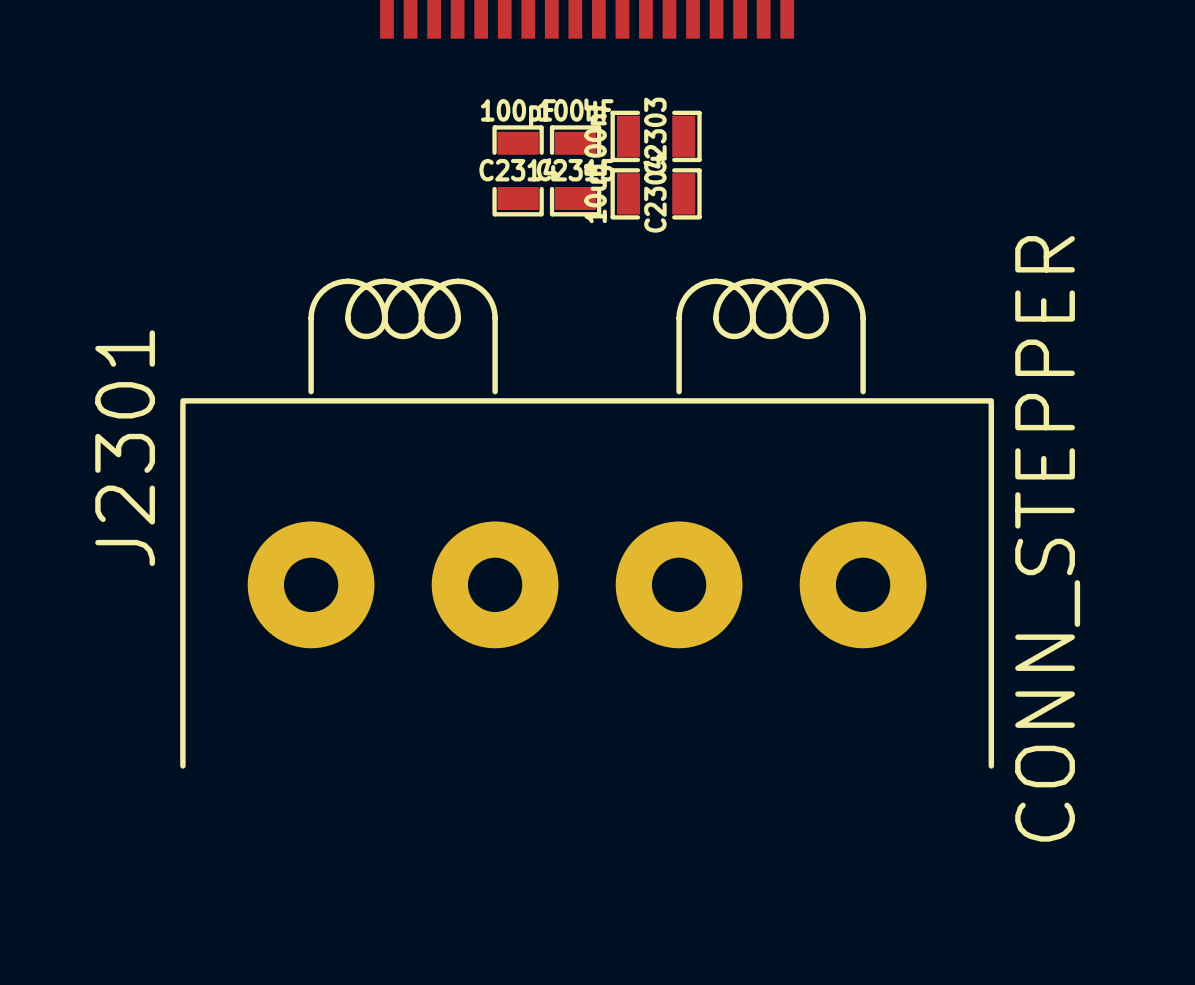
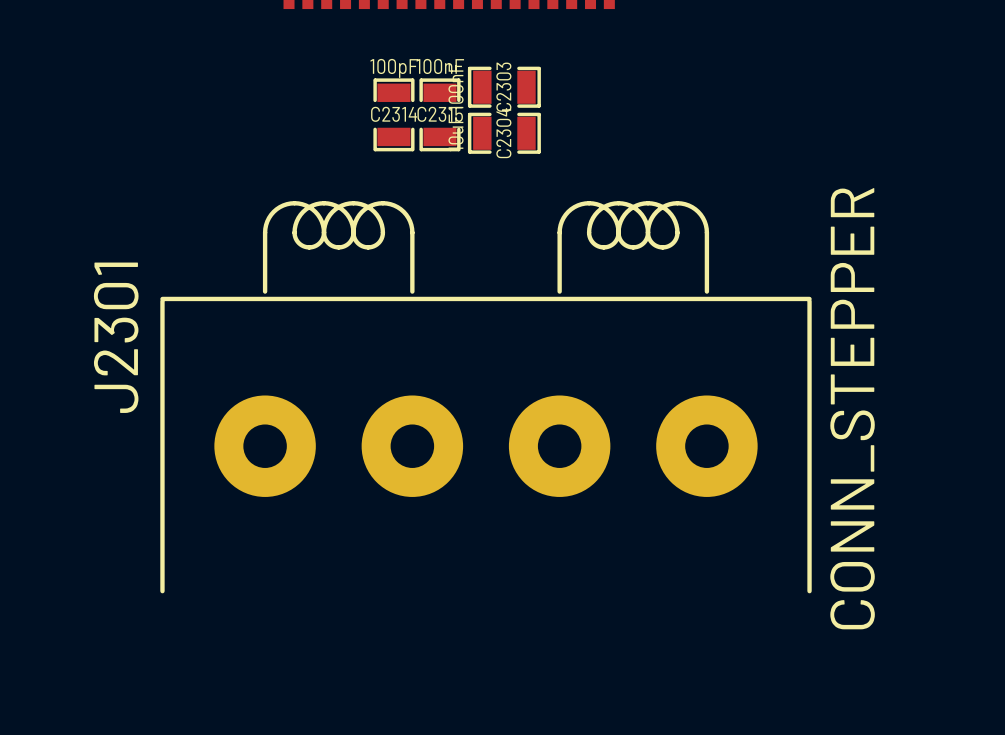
J2301 position: (587, 523) -> (486, 397)

